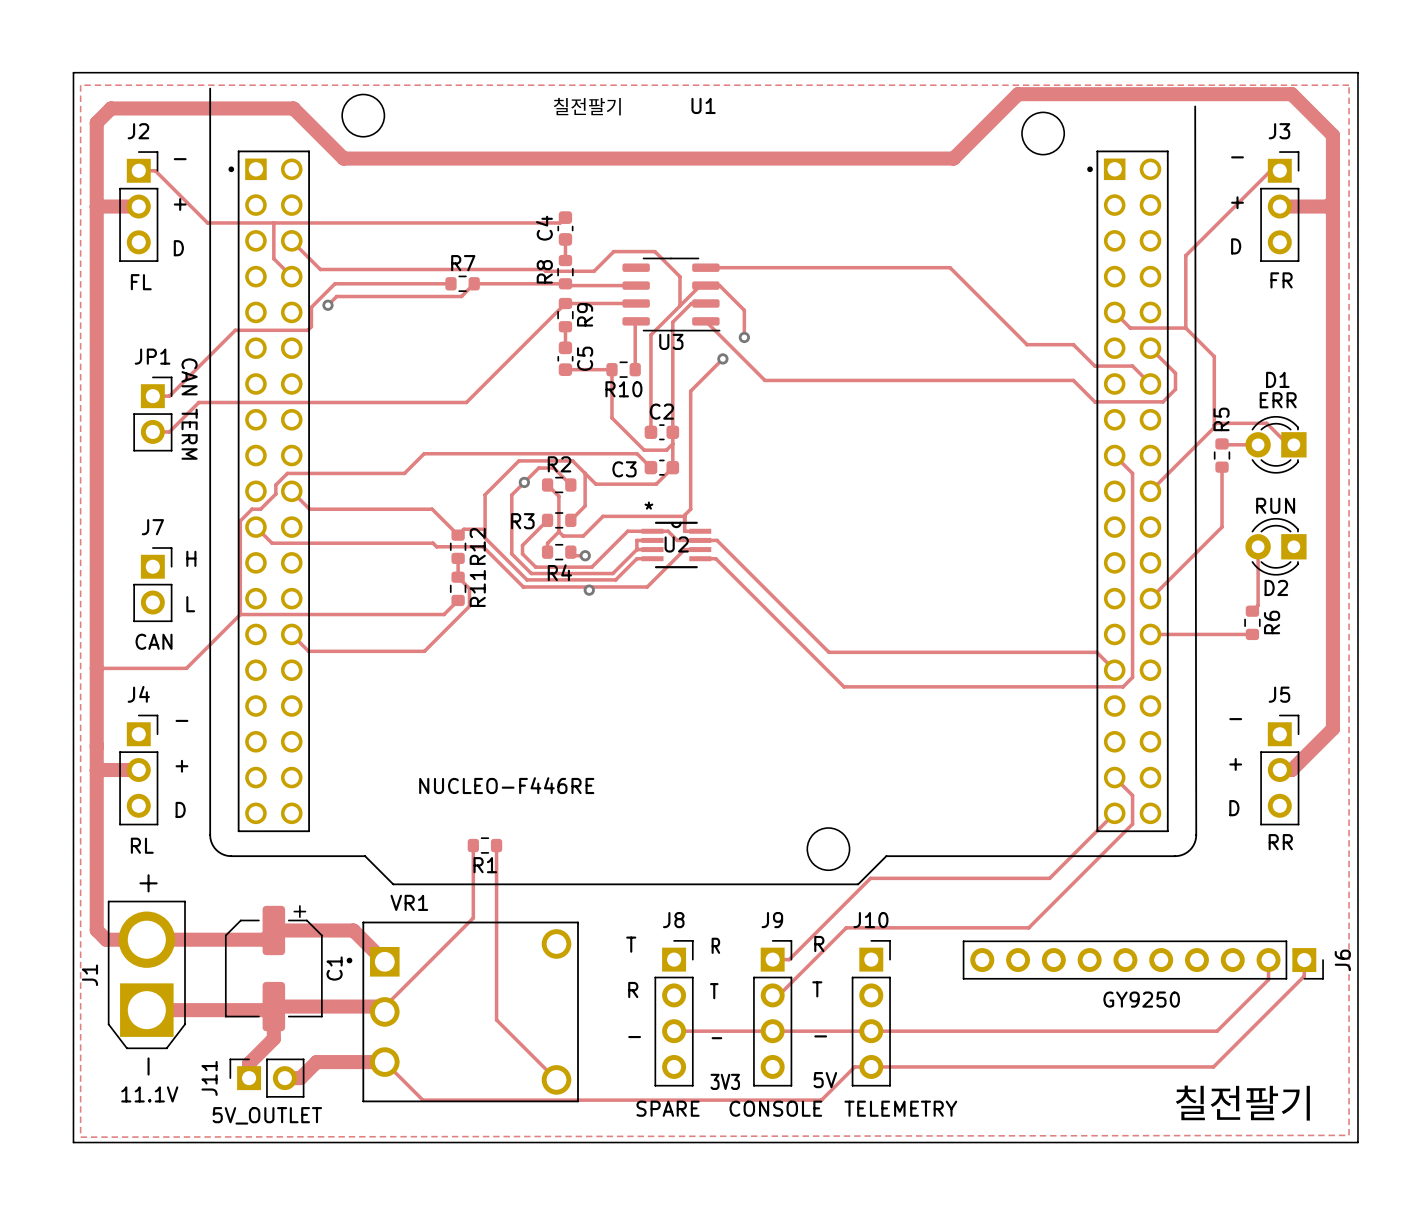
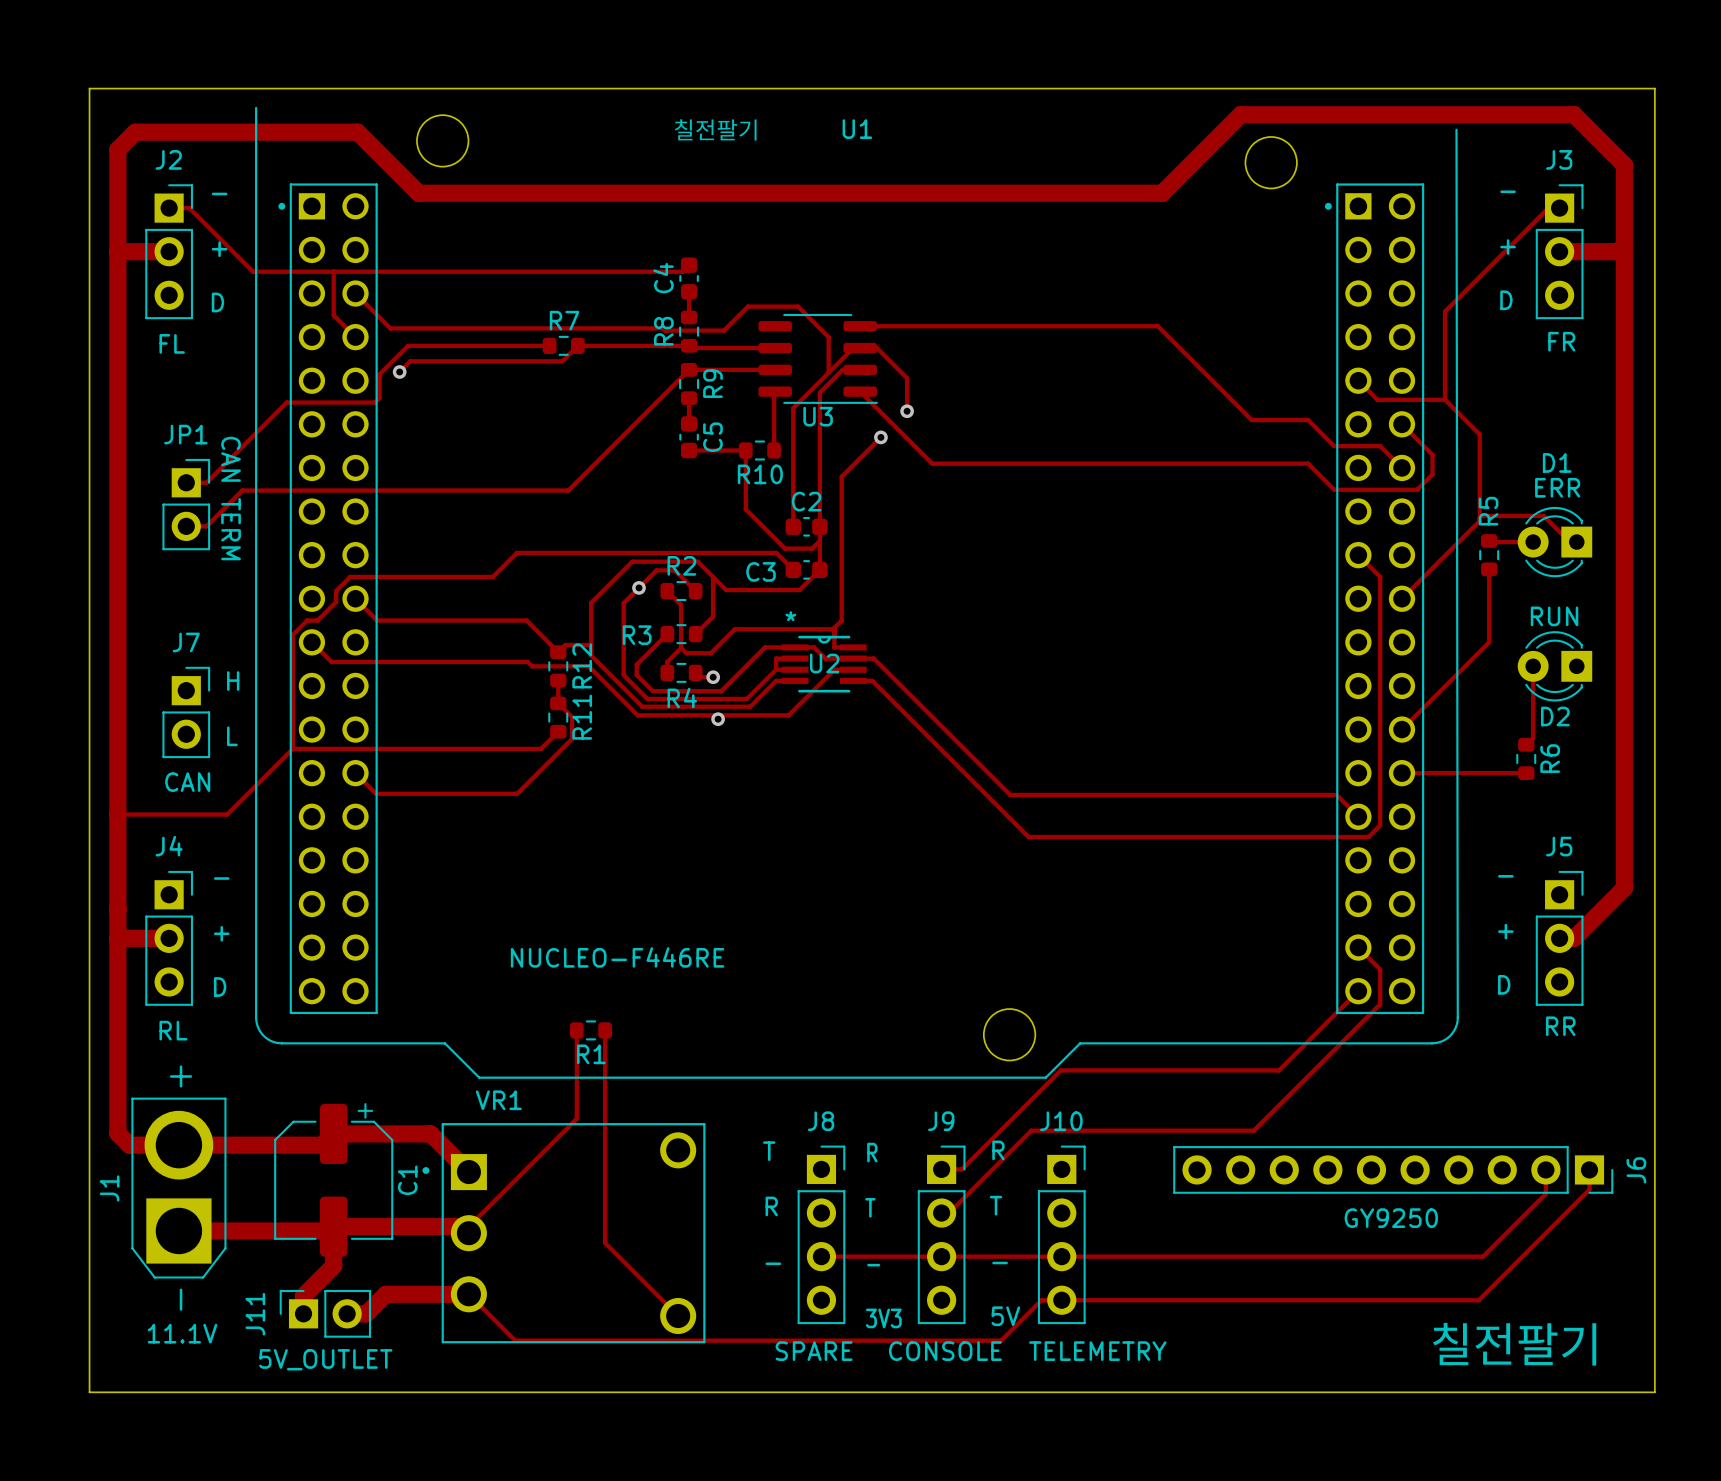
zone outline: (80, 85) (1349, 85) (1349, 1135) (80, 1137) (80, 85) -> none

